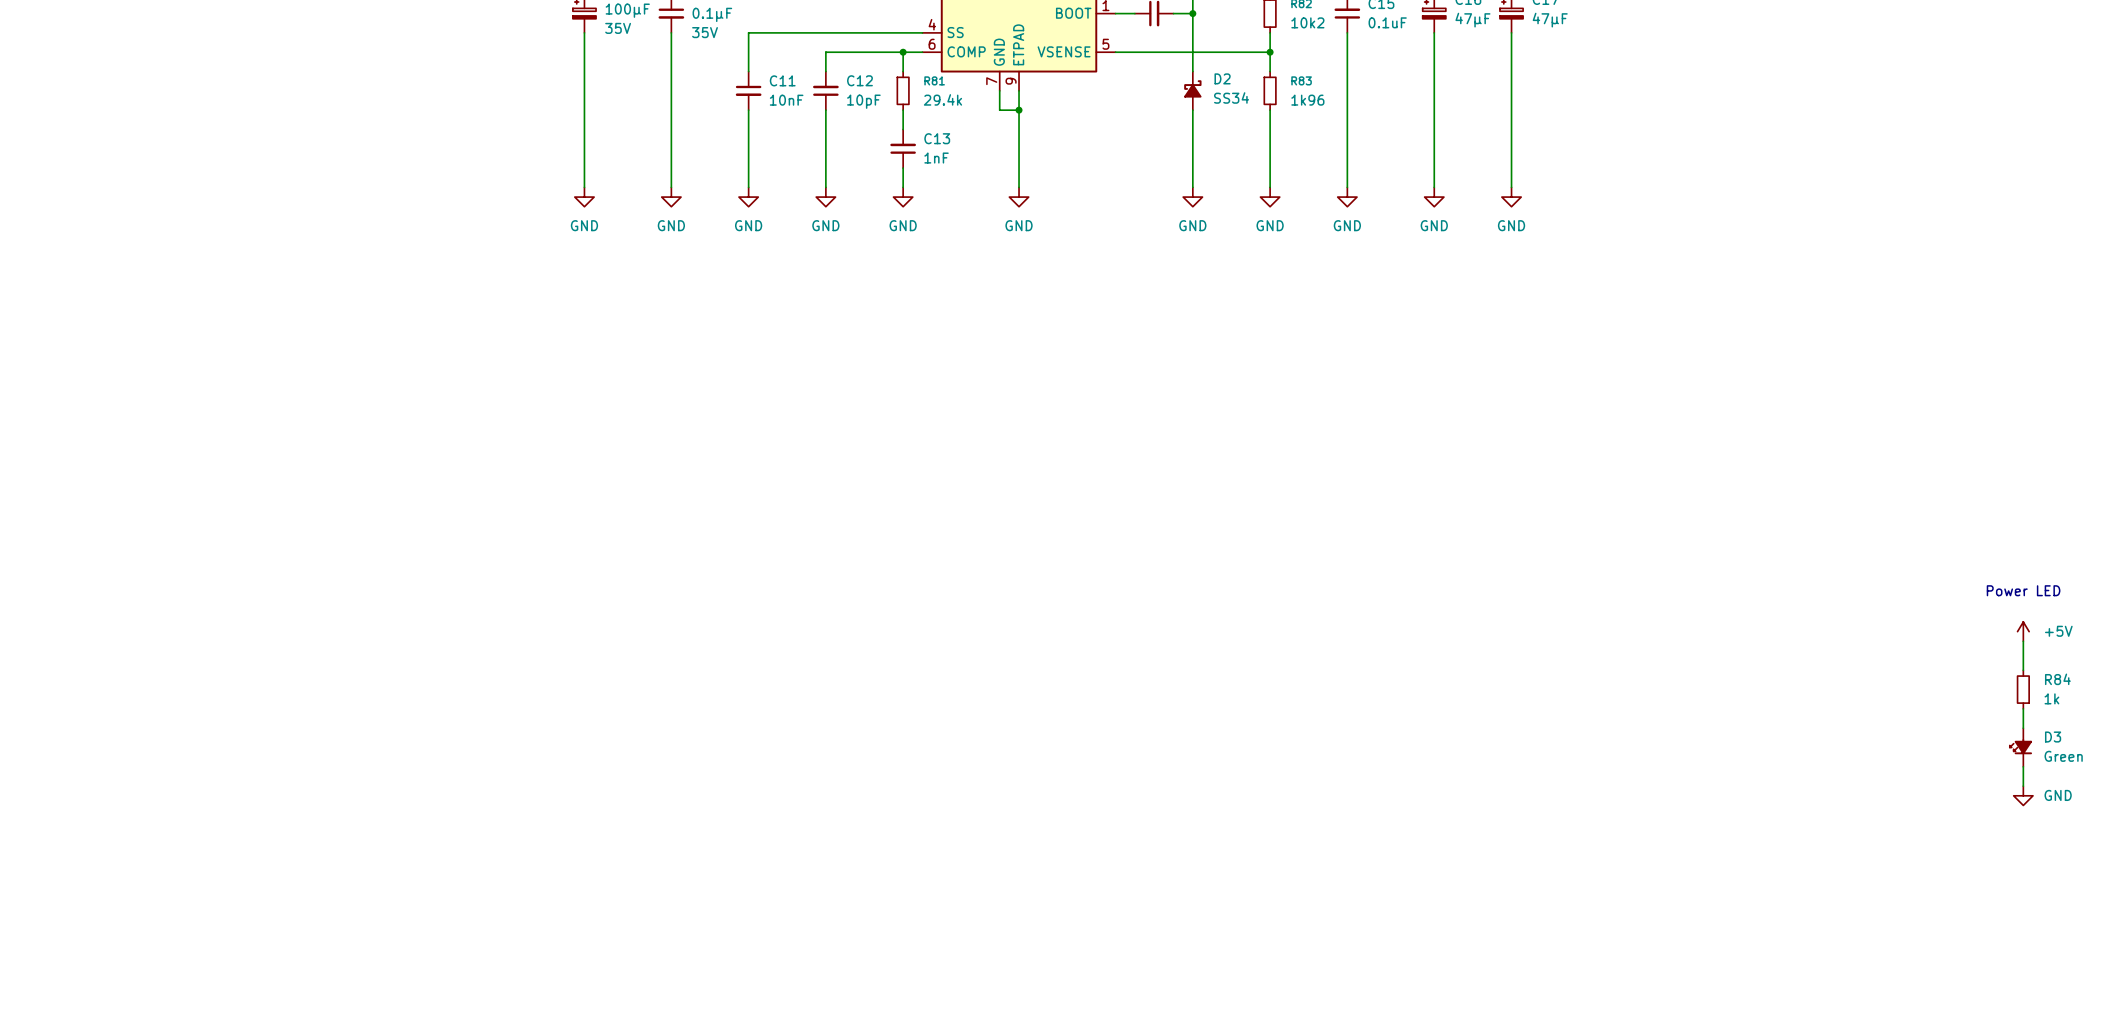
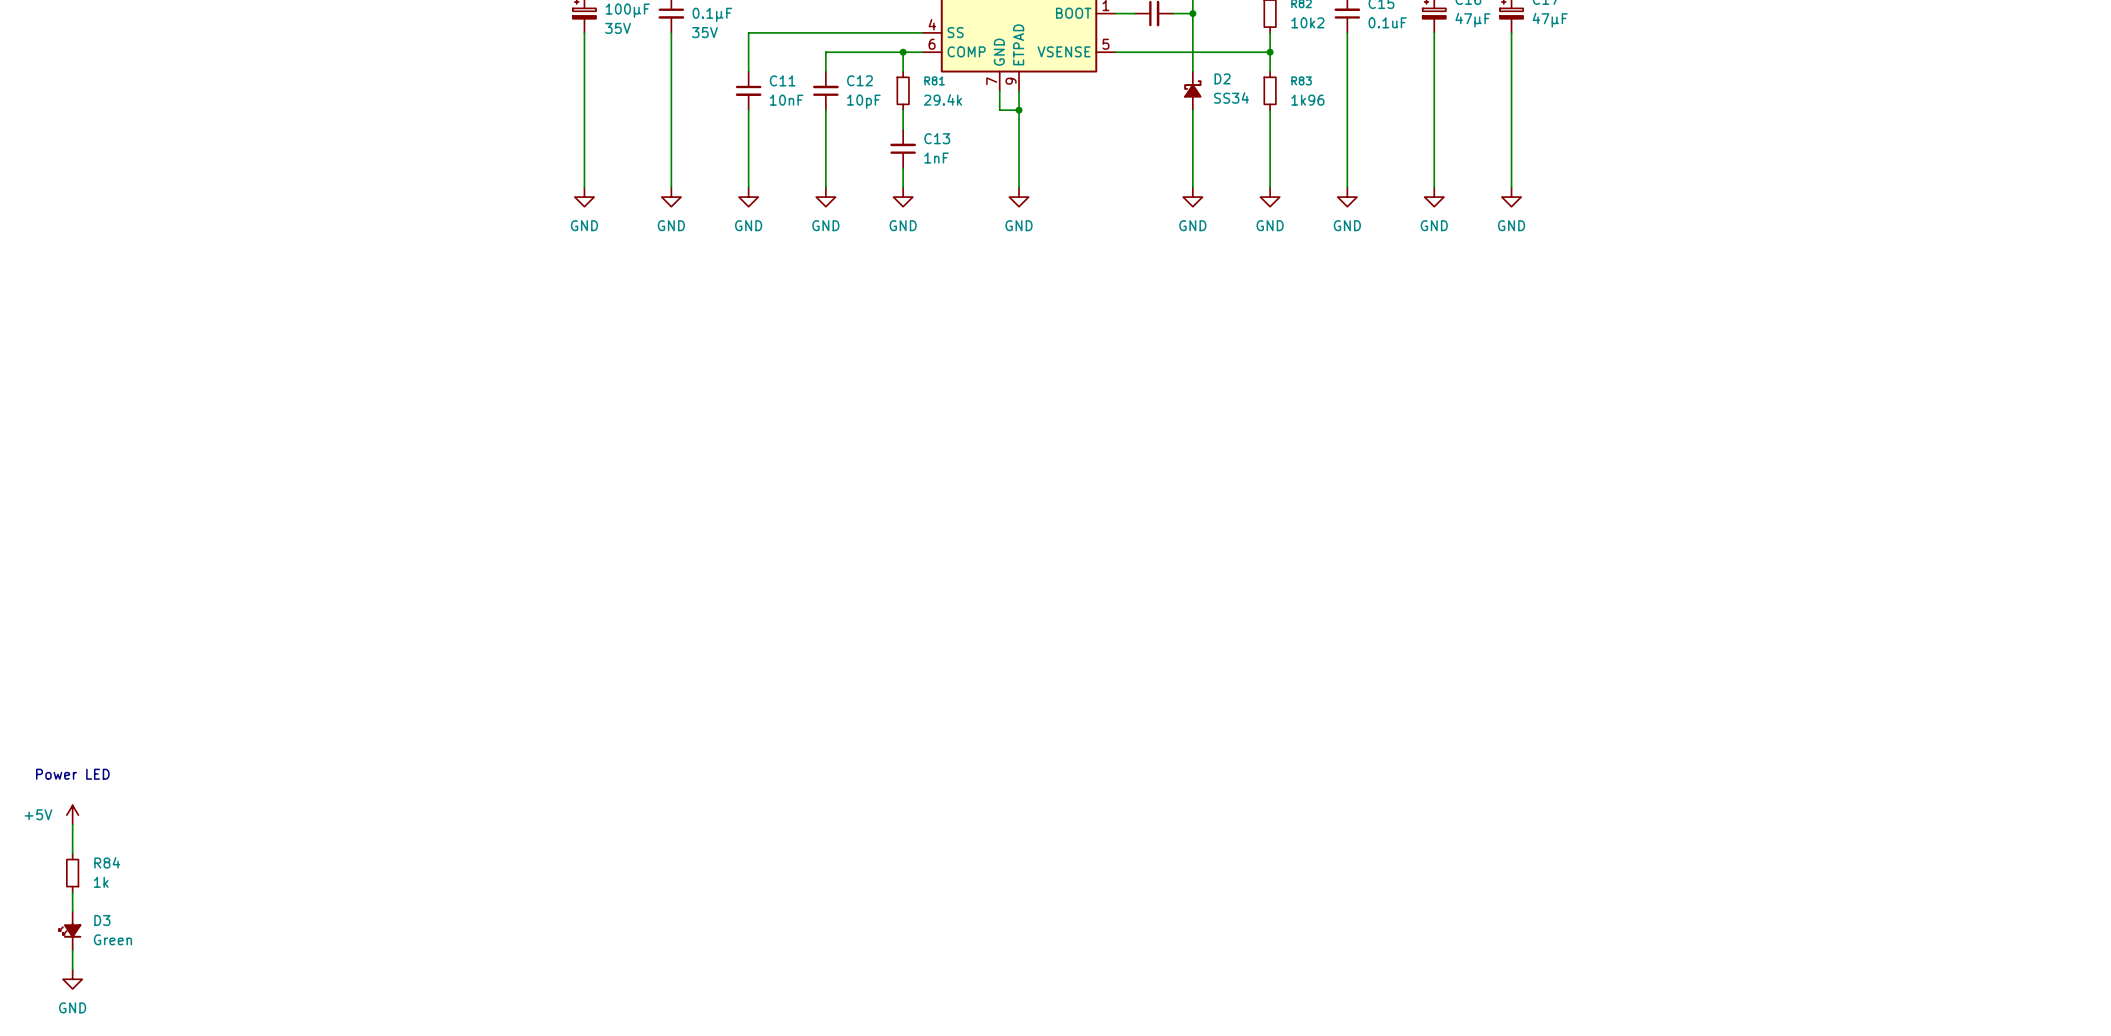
text: Power LED (2023, 590) -> none
power symbol: +5V (2023, 631) -> none
wire: (2023, 641) (2023, 670) -> none
R84 position: (2023, 689) -> (72, 873)
wire: (2023, 708) (2023, 728) -> none
D3 position: (2020, 747) -> (70, 931)
wire: (2023, 766) (2023, 786) -> none
text: none -> Power LED (72, 774)
power symbol: GND (2023, 795) -> none
power symbol: none -> +5V (72, 815)
wire: none -> (72, 824) (72, 853)
wire: none -> (72, 892) (72, 911)
wire: none -> (72, 950) (72, 969)
power symbol: none -> GND (72, 979)

